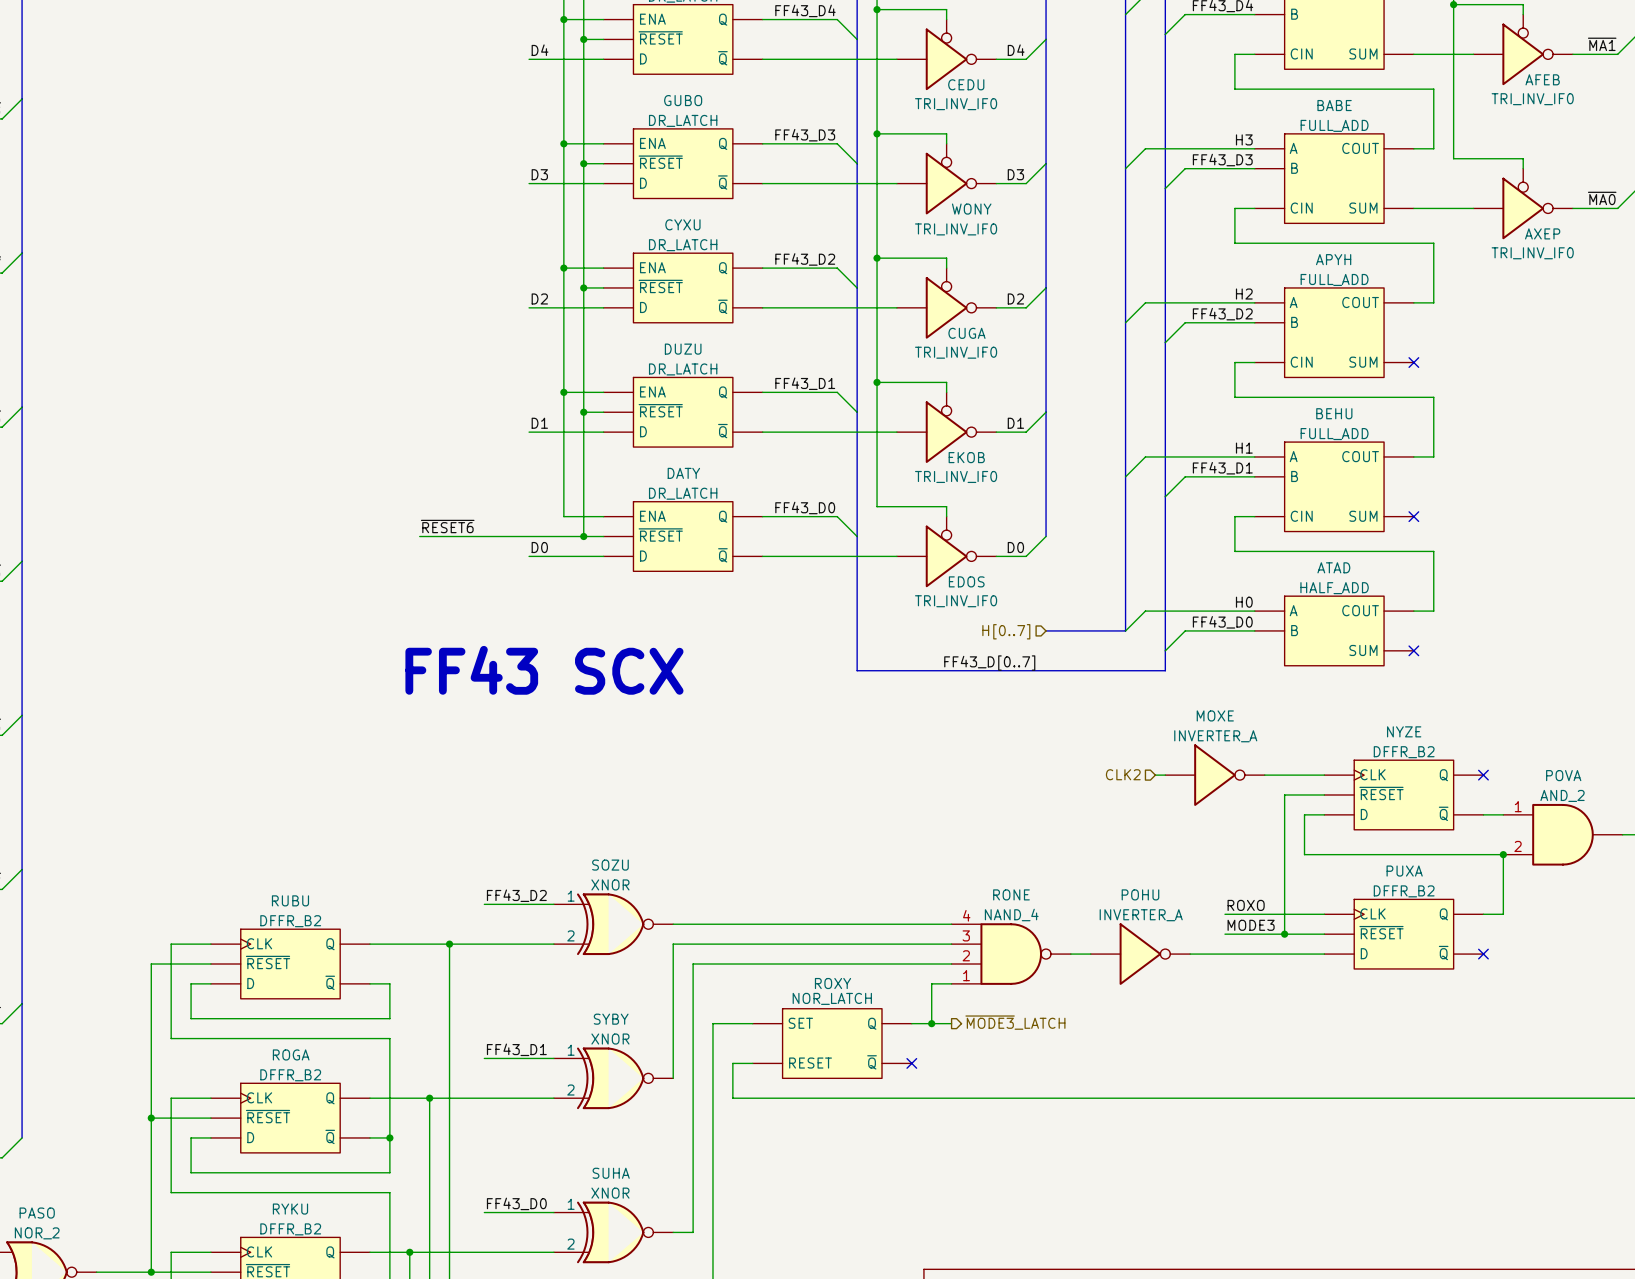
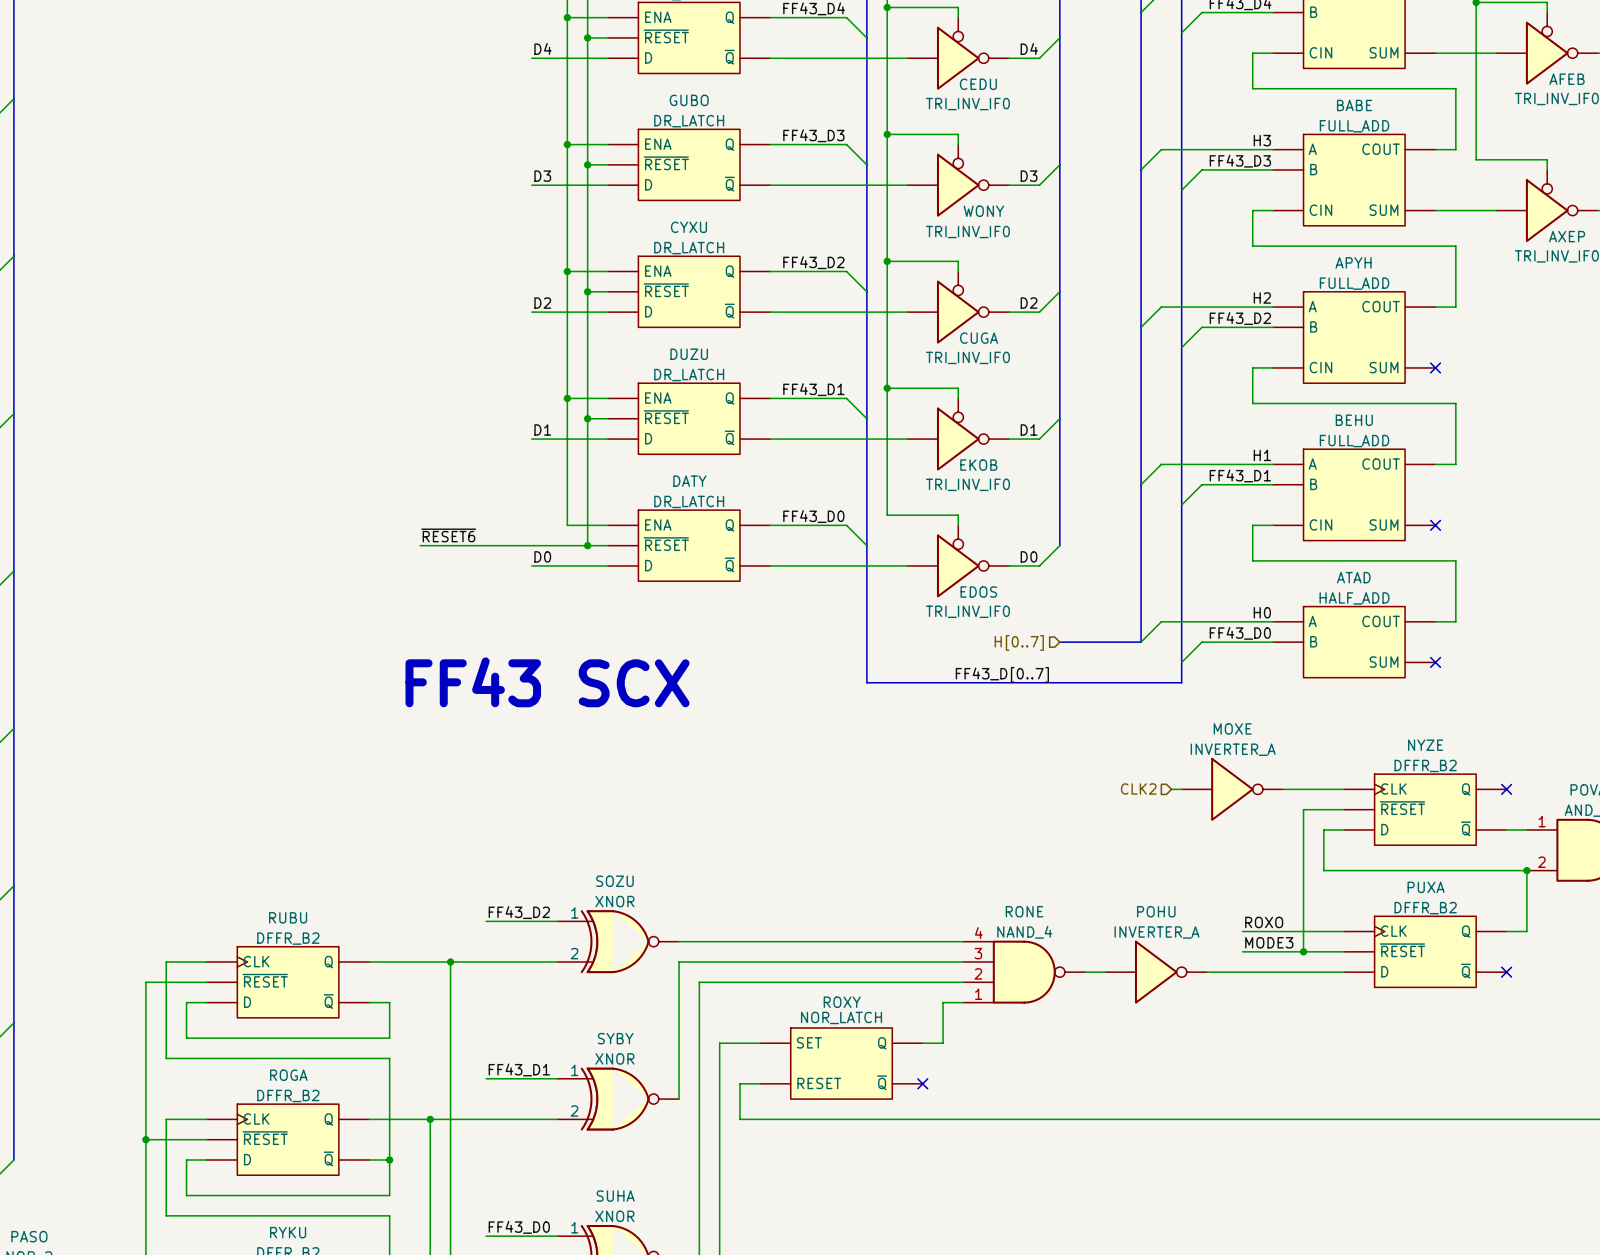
hierarchical label: ~{MODE3}_LATCH (1015, 1022) -> none
wire: (931, 1023) (951, 1023) -> none
junction: (931, 1023) -> none

